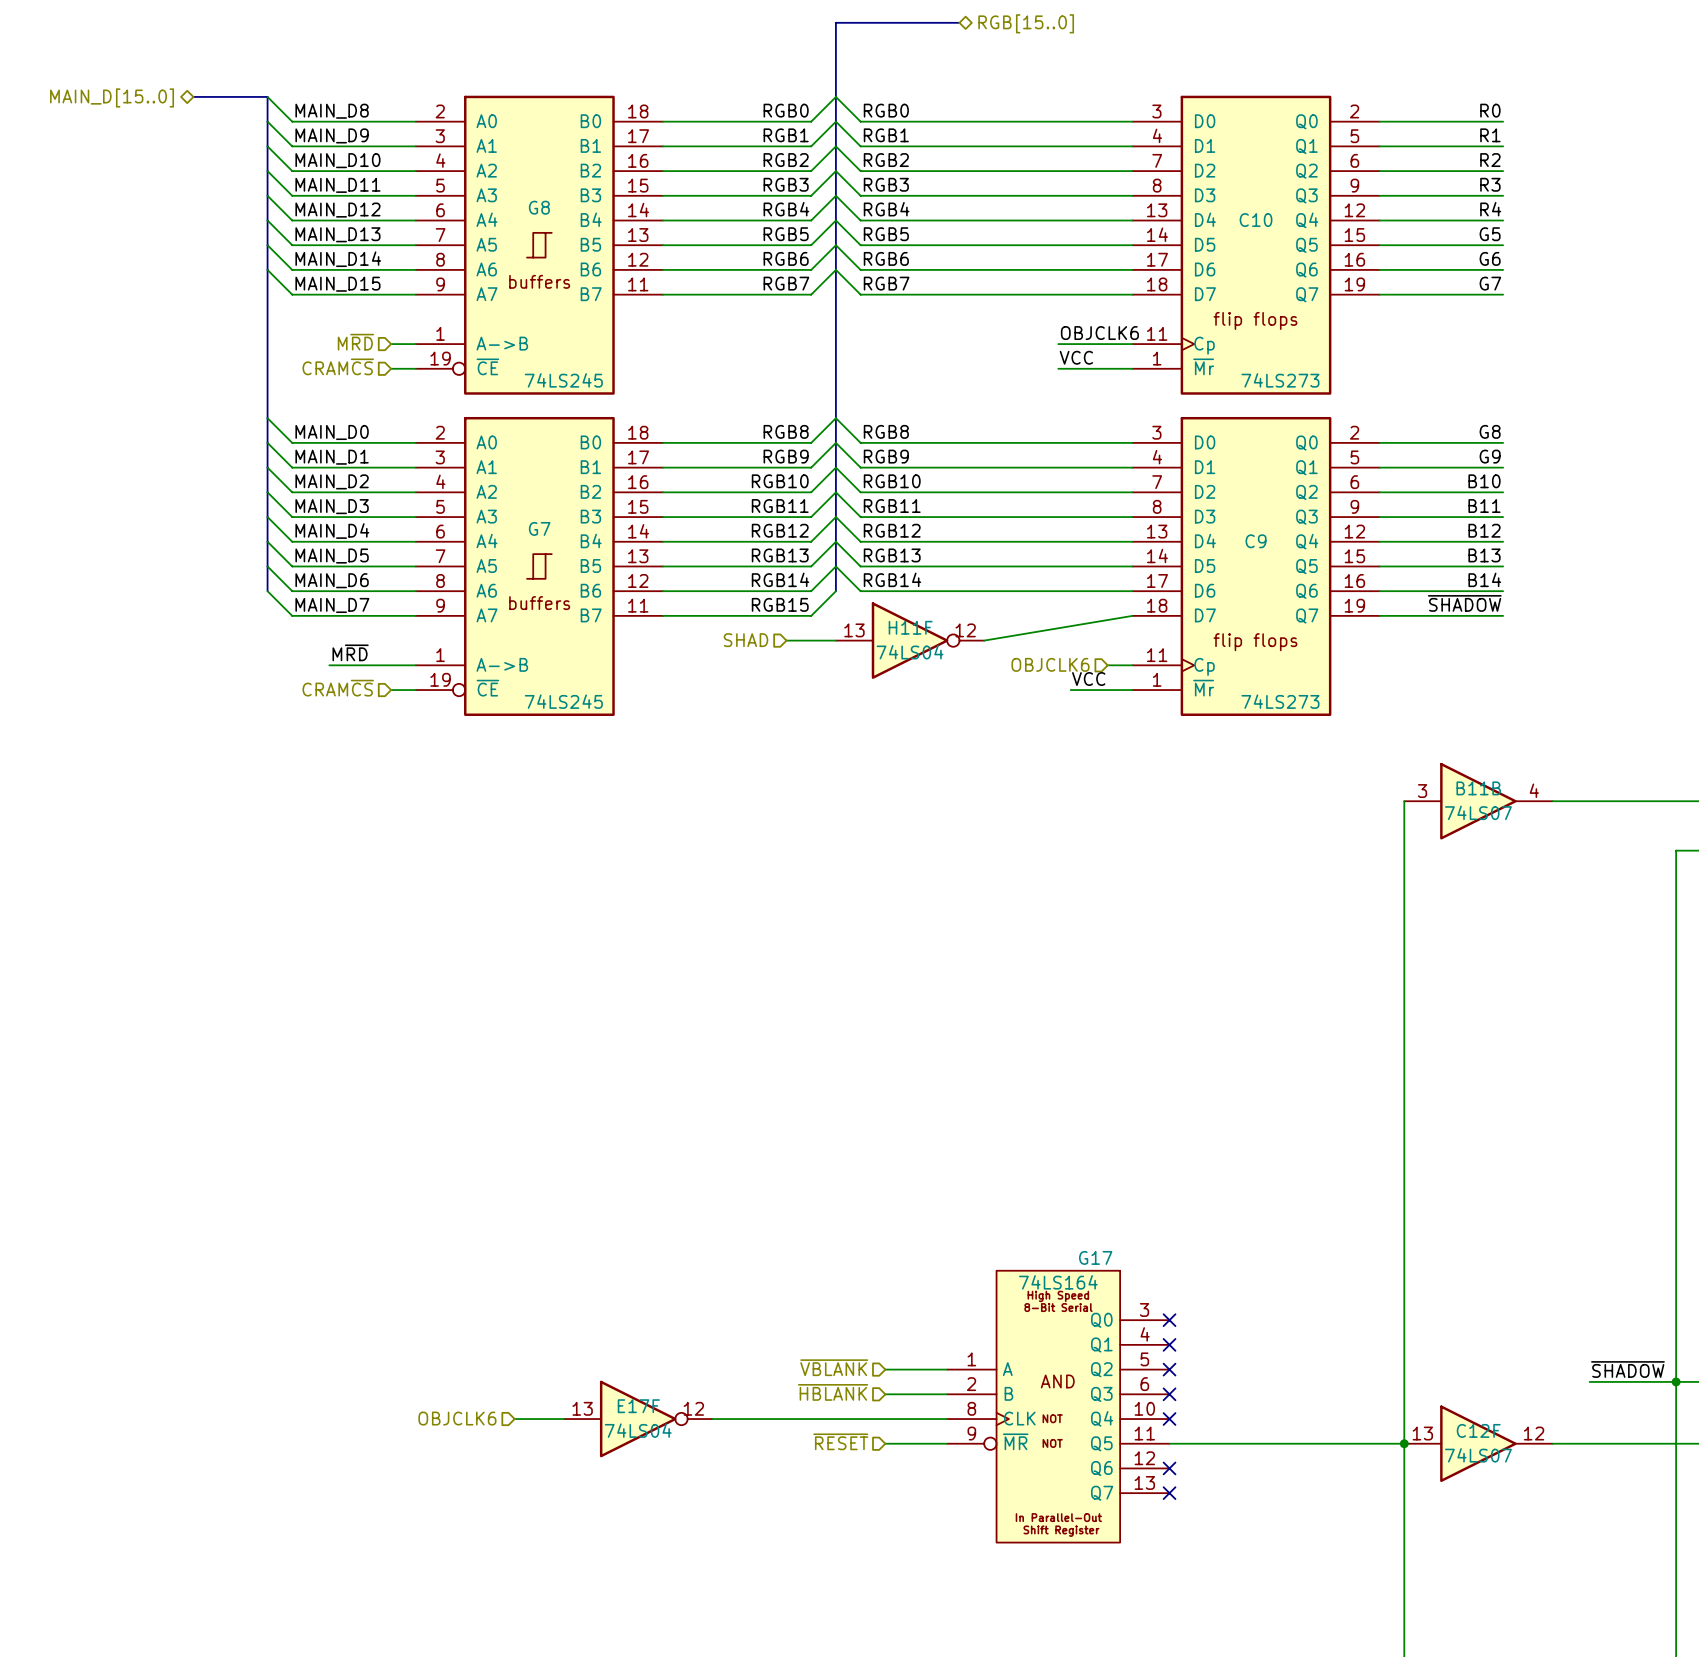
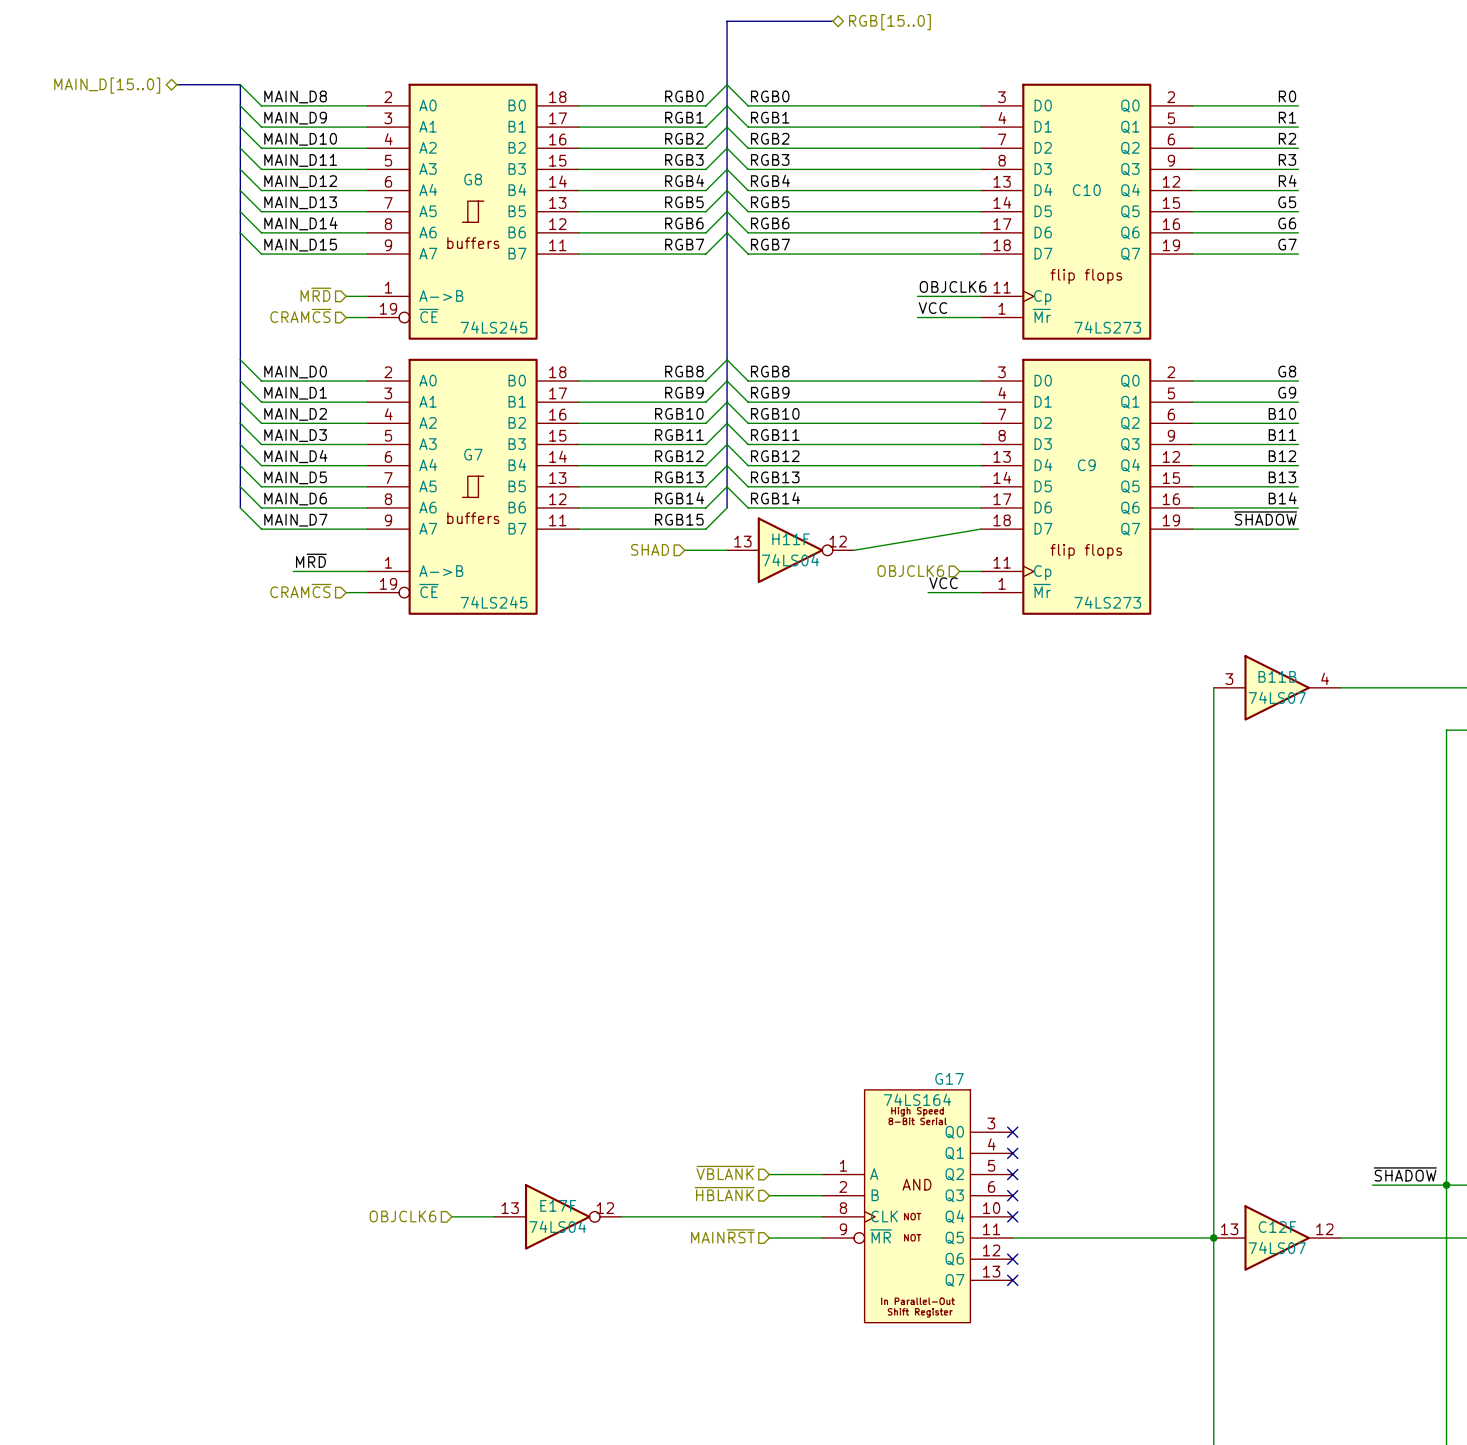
hierarchical label: ~{RESET} (840, 1441) -> MAIN~{RST} (722, 1236)

